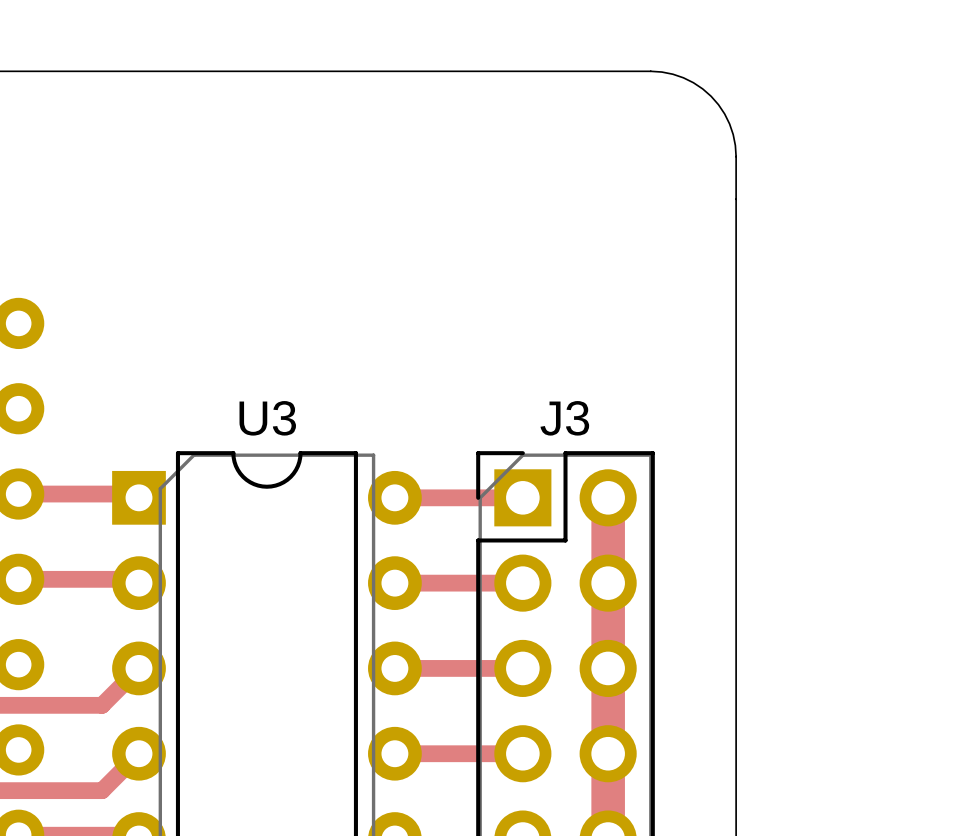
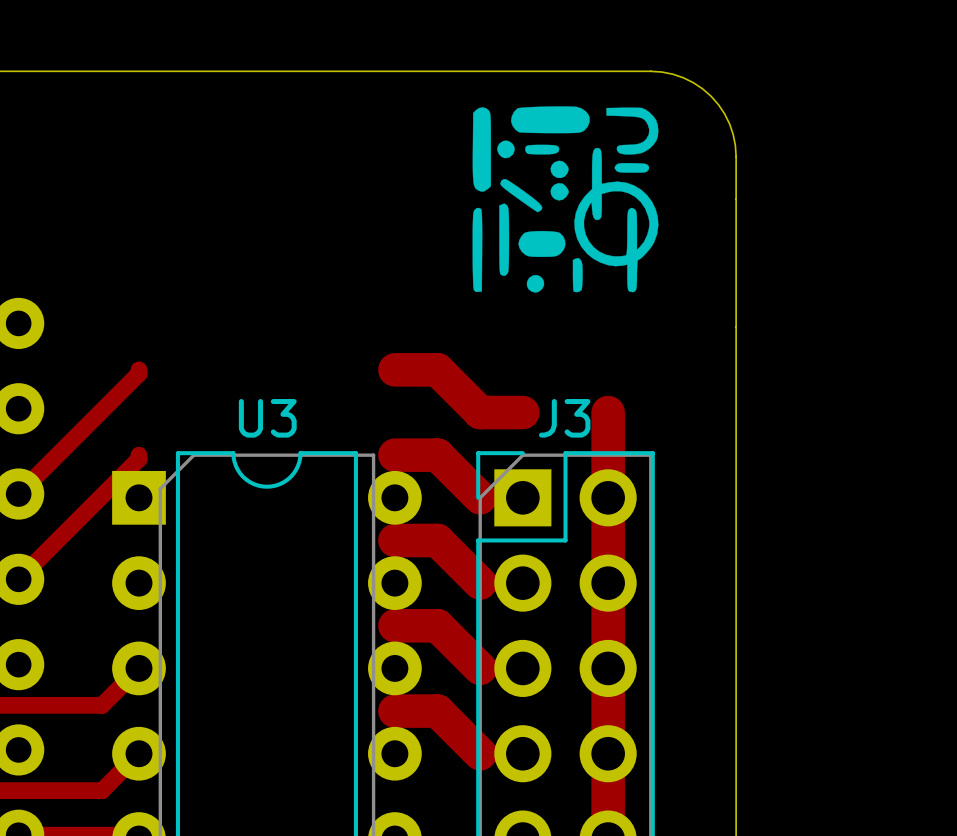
drawing: none -> [472, 106, 659, 293]
top track: none -> (394, 369) (437, 369) (480, 412) (522, 412)
top track: none -> (608, 412) (608, 497)
top track: (18, 494) (135, 494) (138, 497) -> (18, 494) (138, 373) (138, 369)
top track: (394, 497) (480, 497) -> (394, 455) (437, 455) (480, 497)
top track: (18, 579) (135, 579) (138, 583) -> (18, 579) (138, 459) (138, 455)
top track: (394, 583) (480, 583) -> (394, 540) (437, 540) (480, 583)
top track: (394, 668) (480, 668) -> (394, 625) (437, 625) (480, 668)
top track: (394, 753) (480, 753) -> (394, 711) (437, 711) (480, 753)

